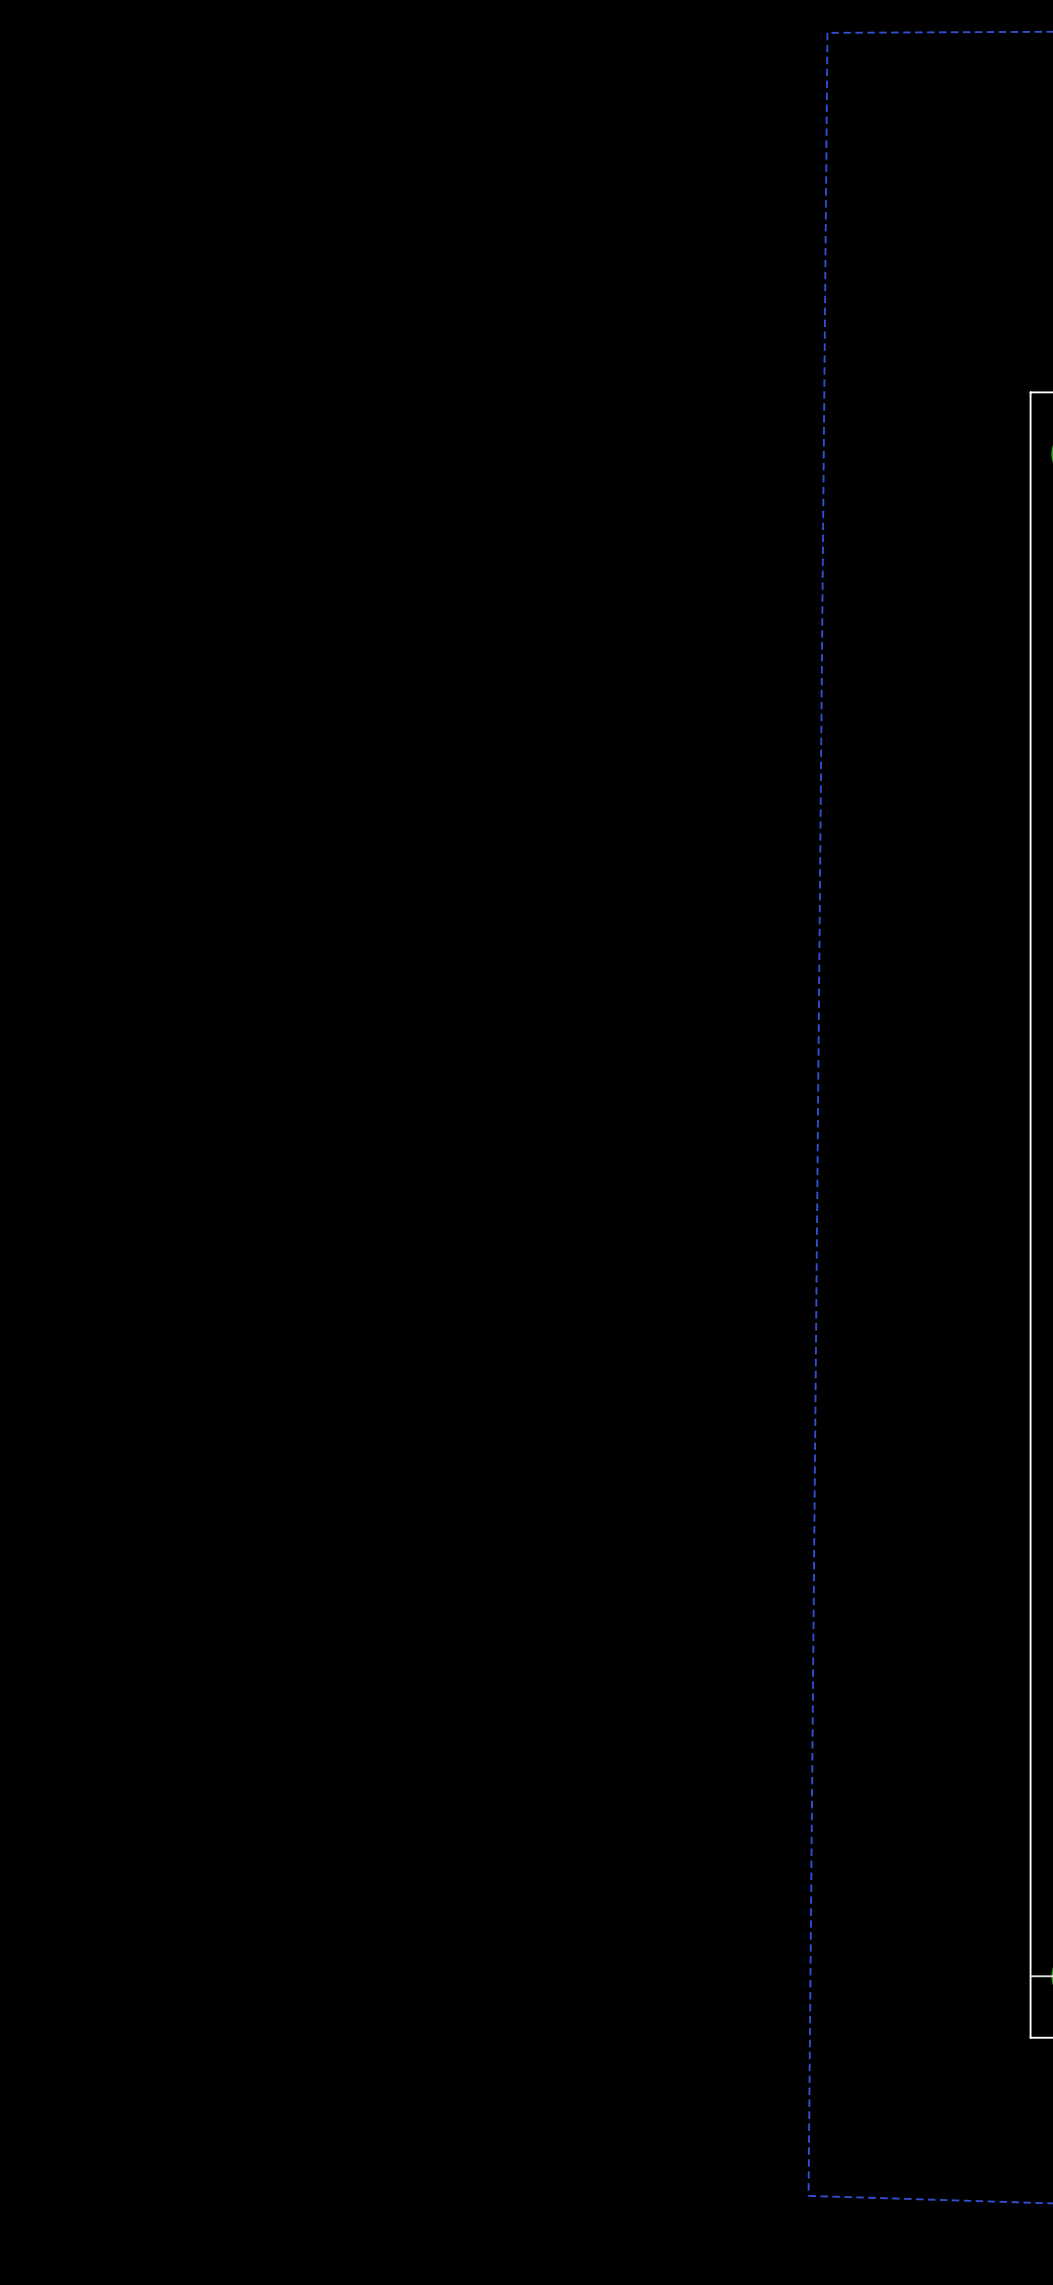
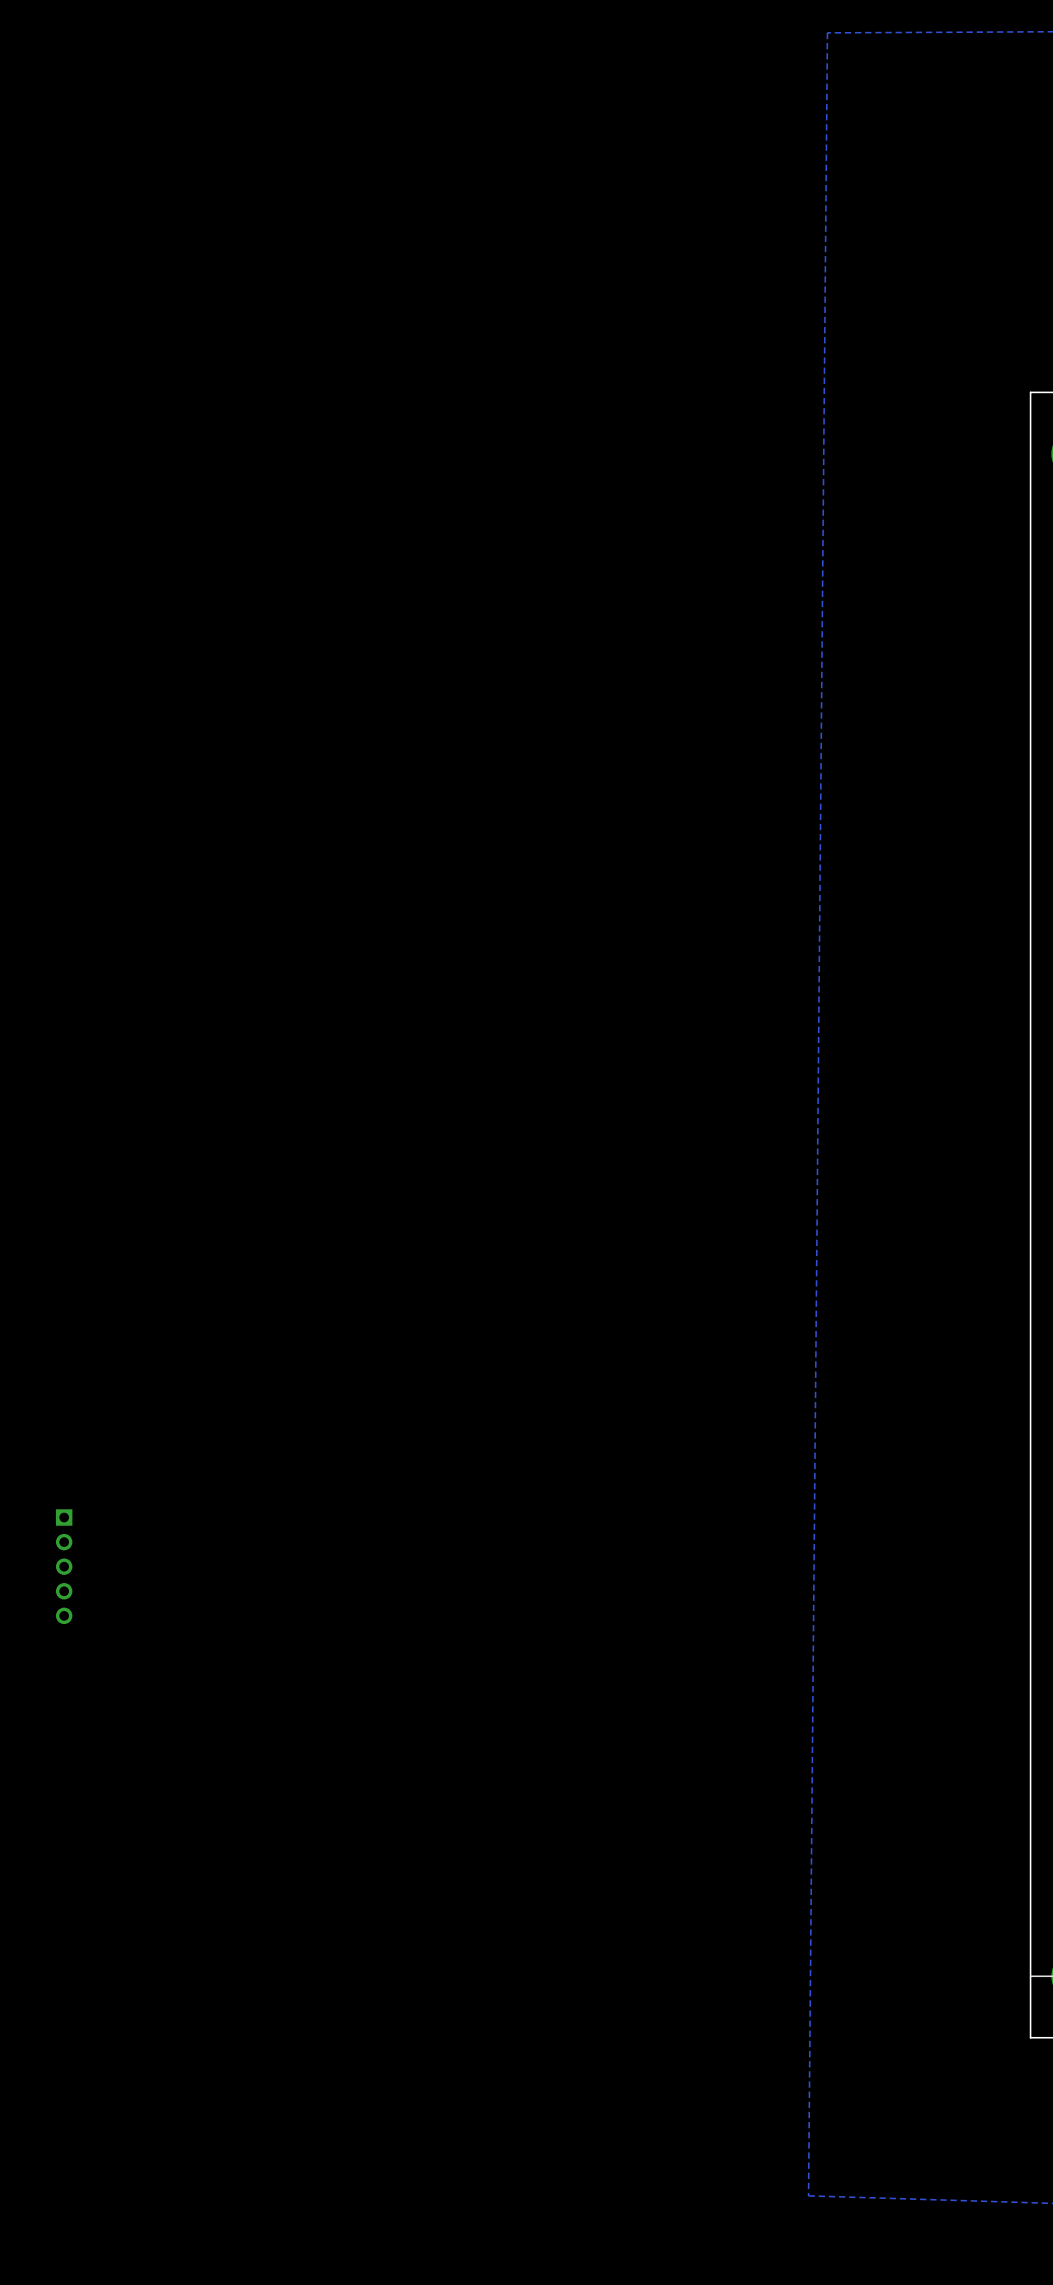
part: none -> (64, 1566)

